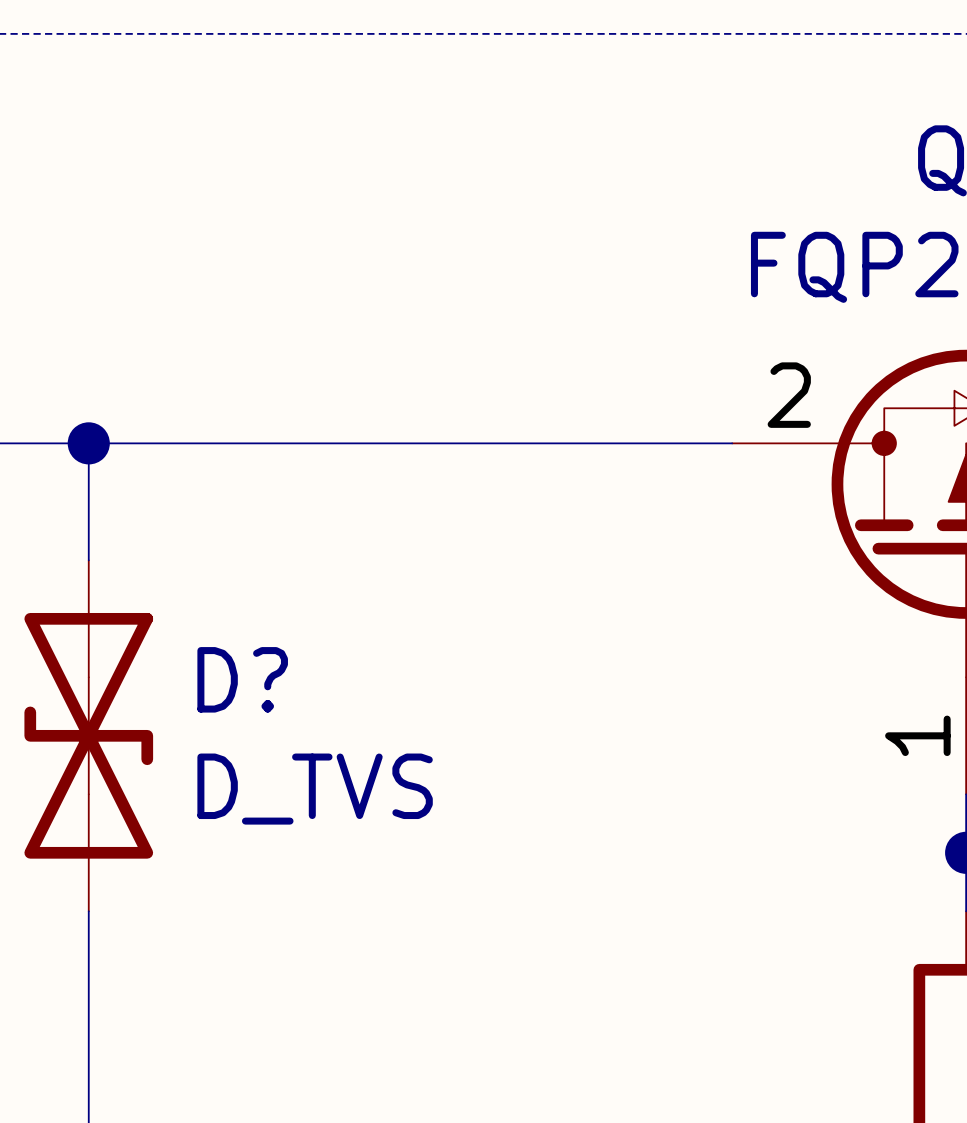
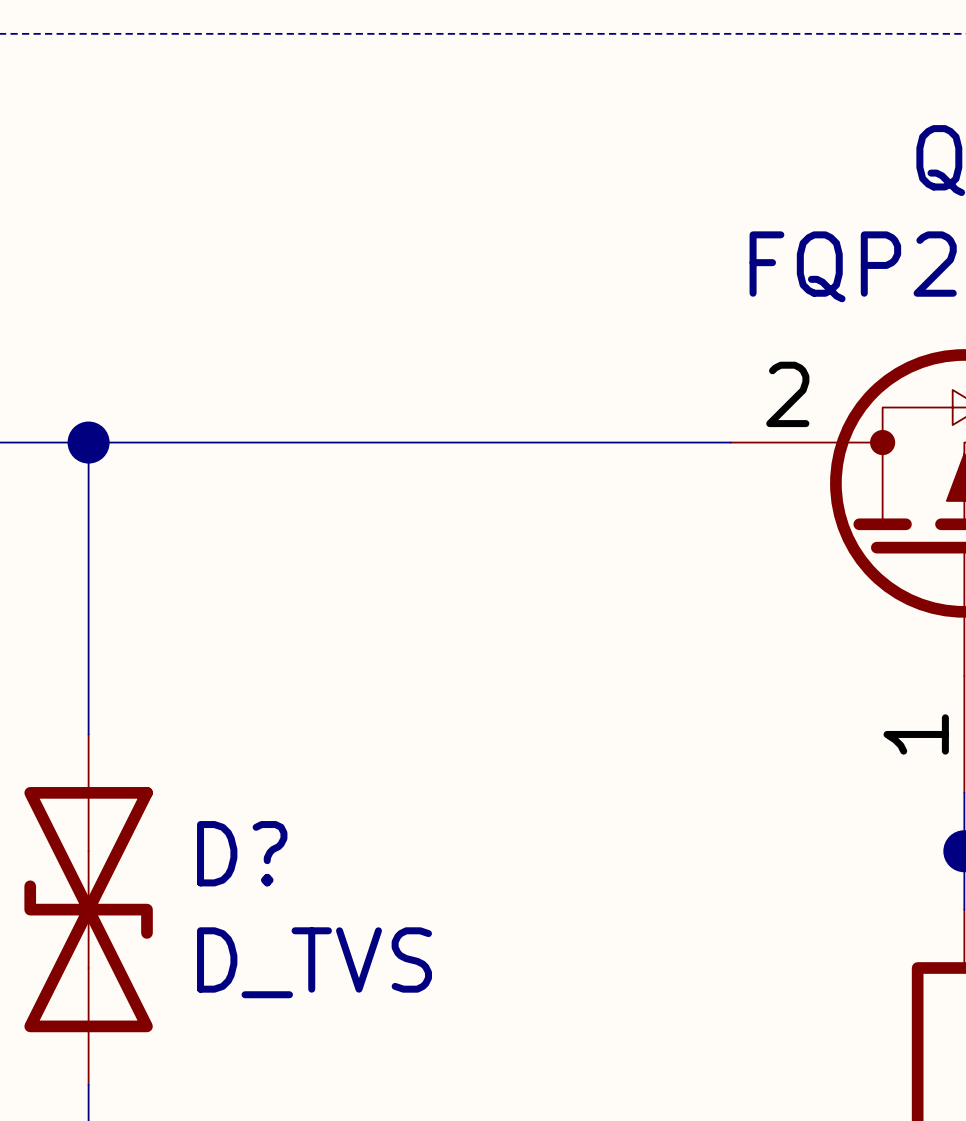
D? position: (88, 735) -> (88, 909)

